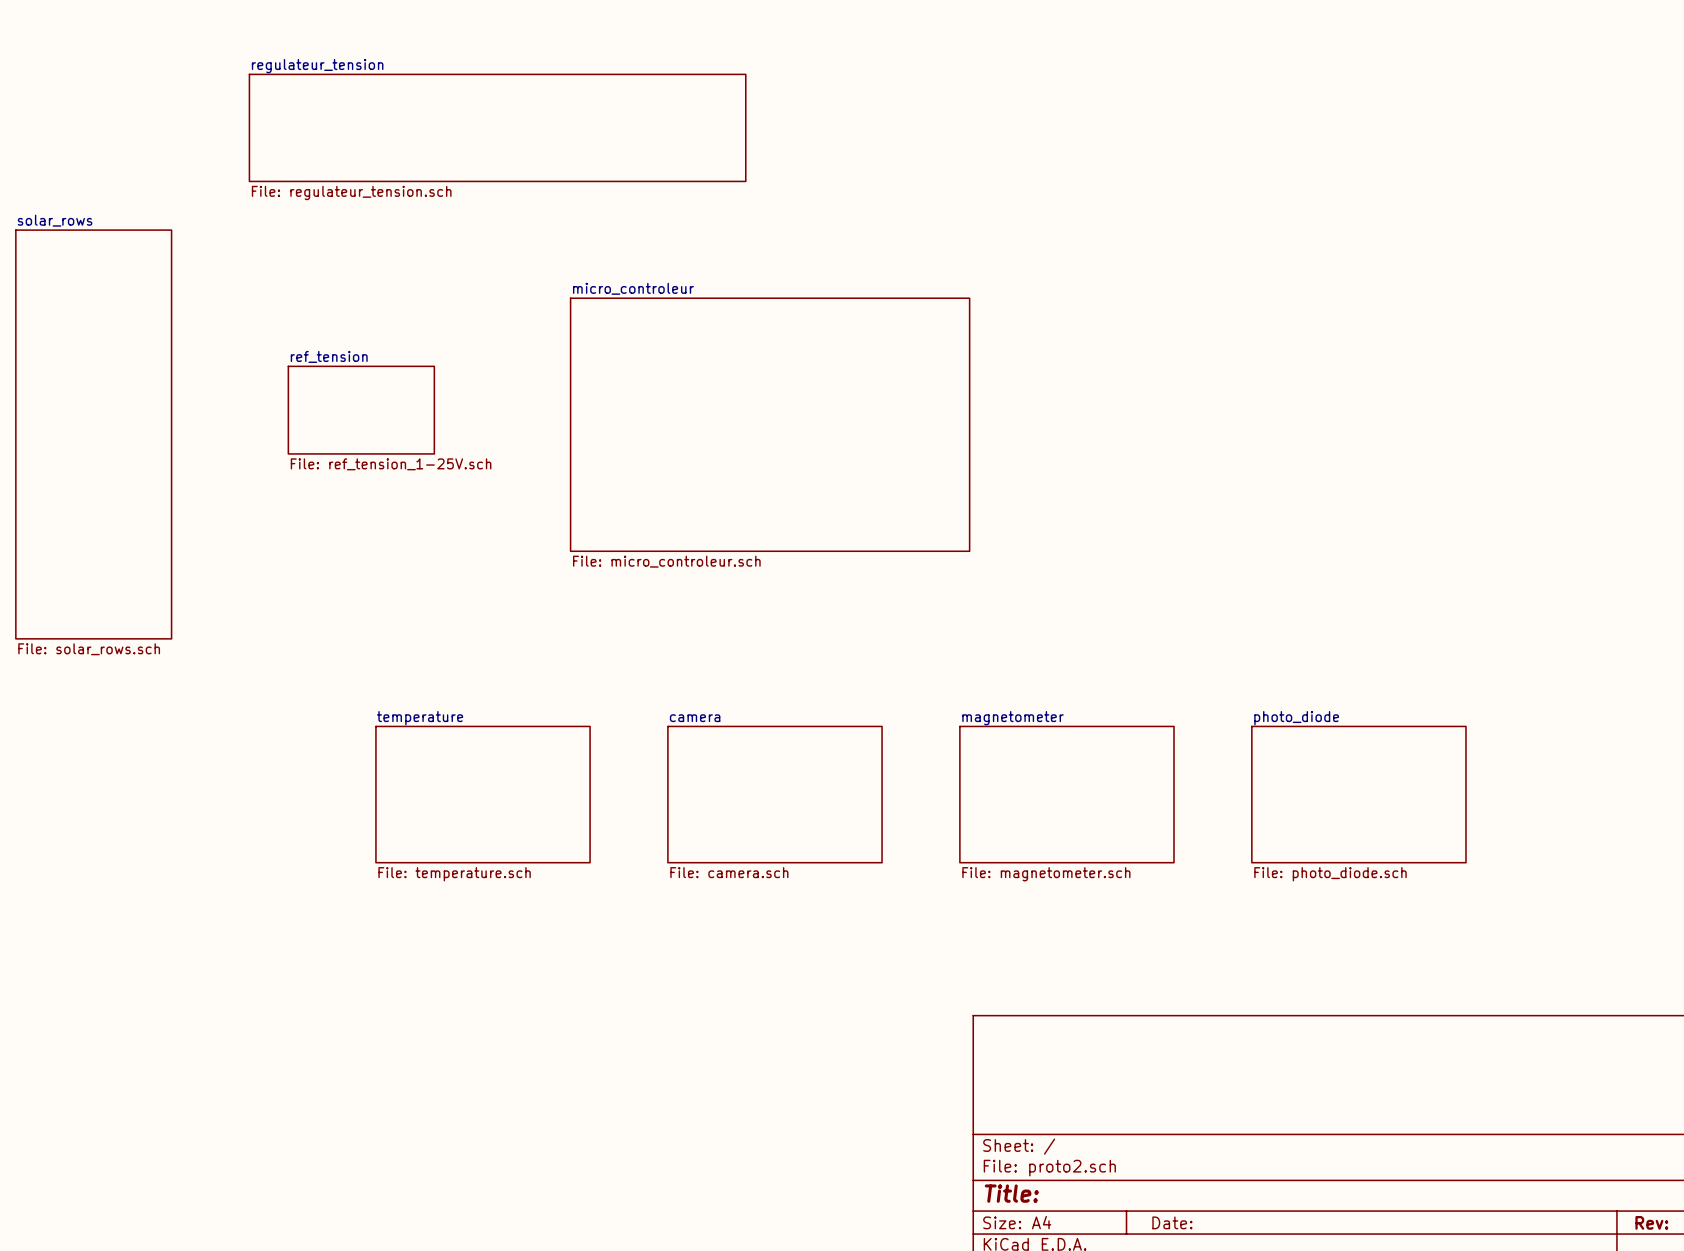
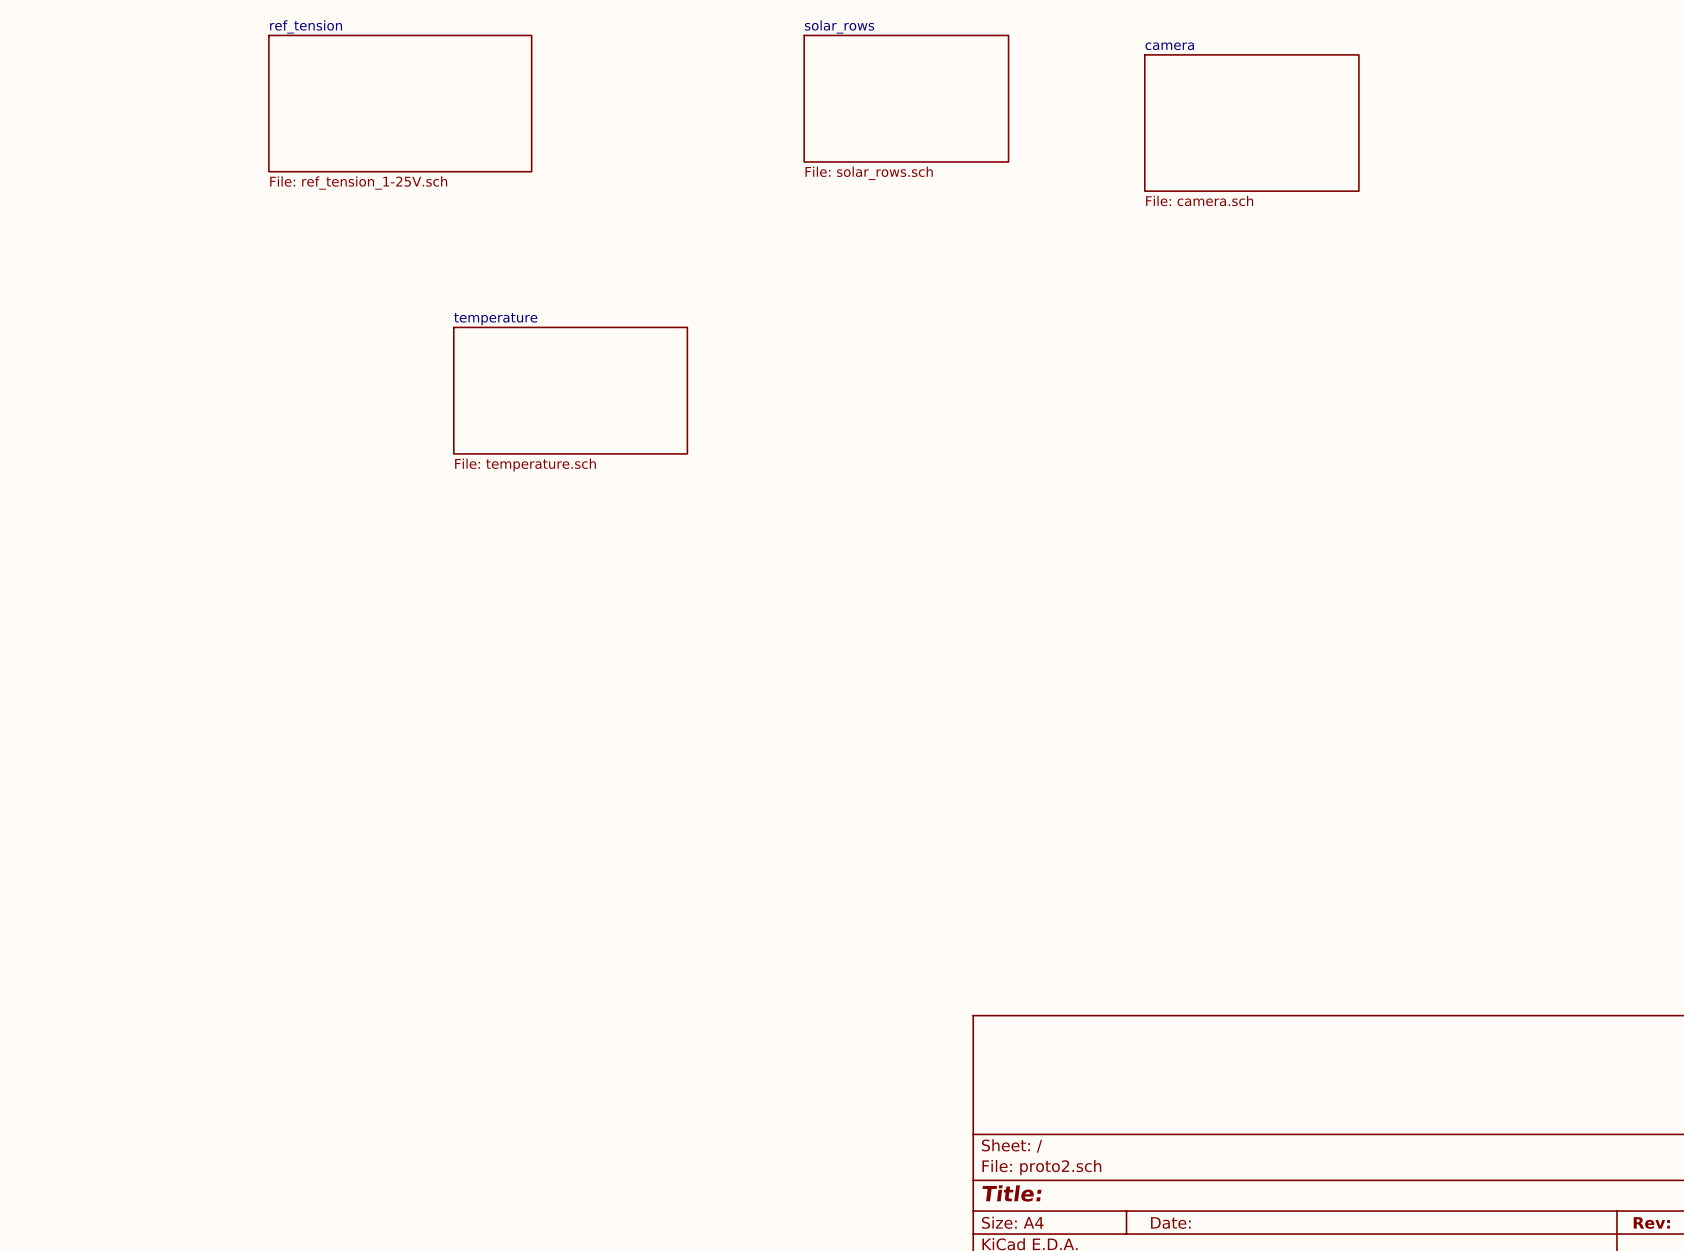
sheet solar_rows: none -> File: solar_rows.sch (906, 98)
sheet ref_tension: none -> File: ref_tension_1-25V.sch (400, 103)
sheet camera: none -> File: camera.sch (1251, 123)
sheet regulateur_tension: File: regulateur_tension.sch (497, 127) -> none
sheet temperature: none -> File: temperature.sch (570, 390)
sheet ref_tension: File: ref_tension_1-25V.sch (361, 410) -> none
sheet micro_controleur: File: micro_controleur.sch (770, 424) -> none
sheet solar_rows: File: solar_rows.sch (93, 434) -> none
sheet temperature: File: temperature.sch (483, 794) -> none
sheet camera: File: camera.sch (774, 794) -> none
sheet magnetometer: File: magnetometer.sch (1066, 794) -> none
sheet photo_diode: File: photo_diode.sch (1358, 794) -> none

